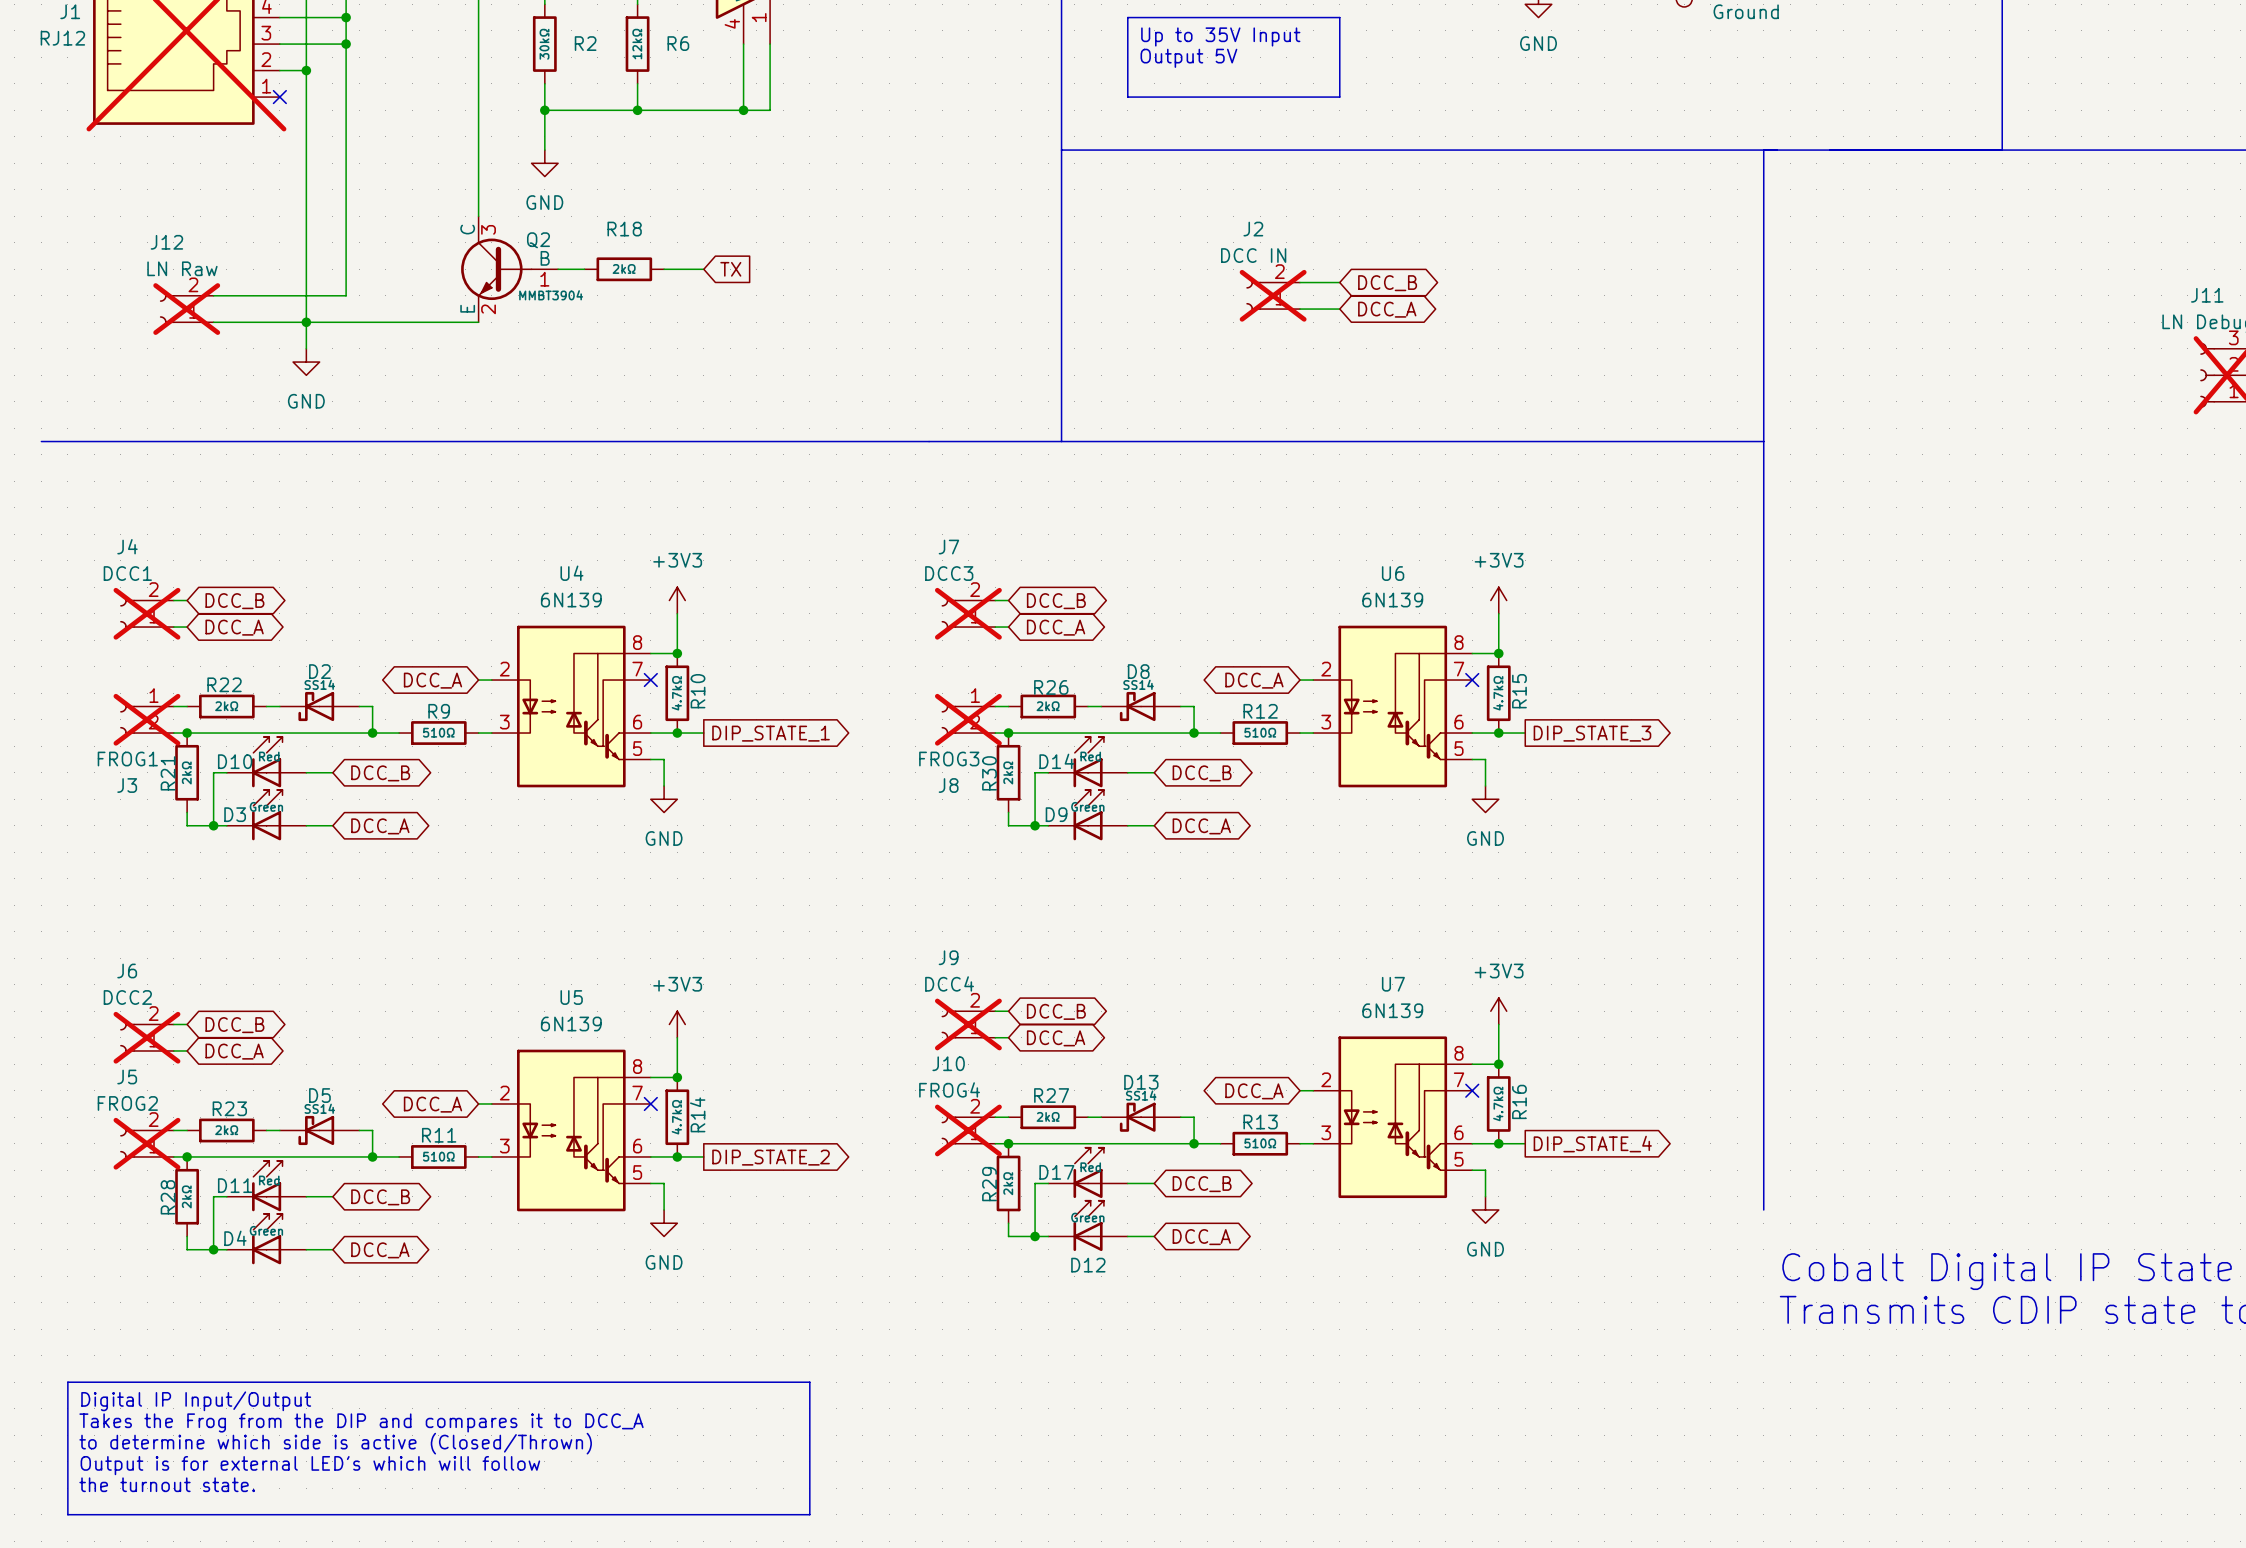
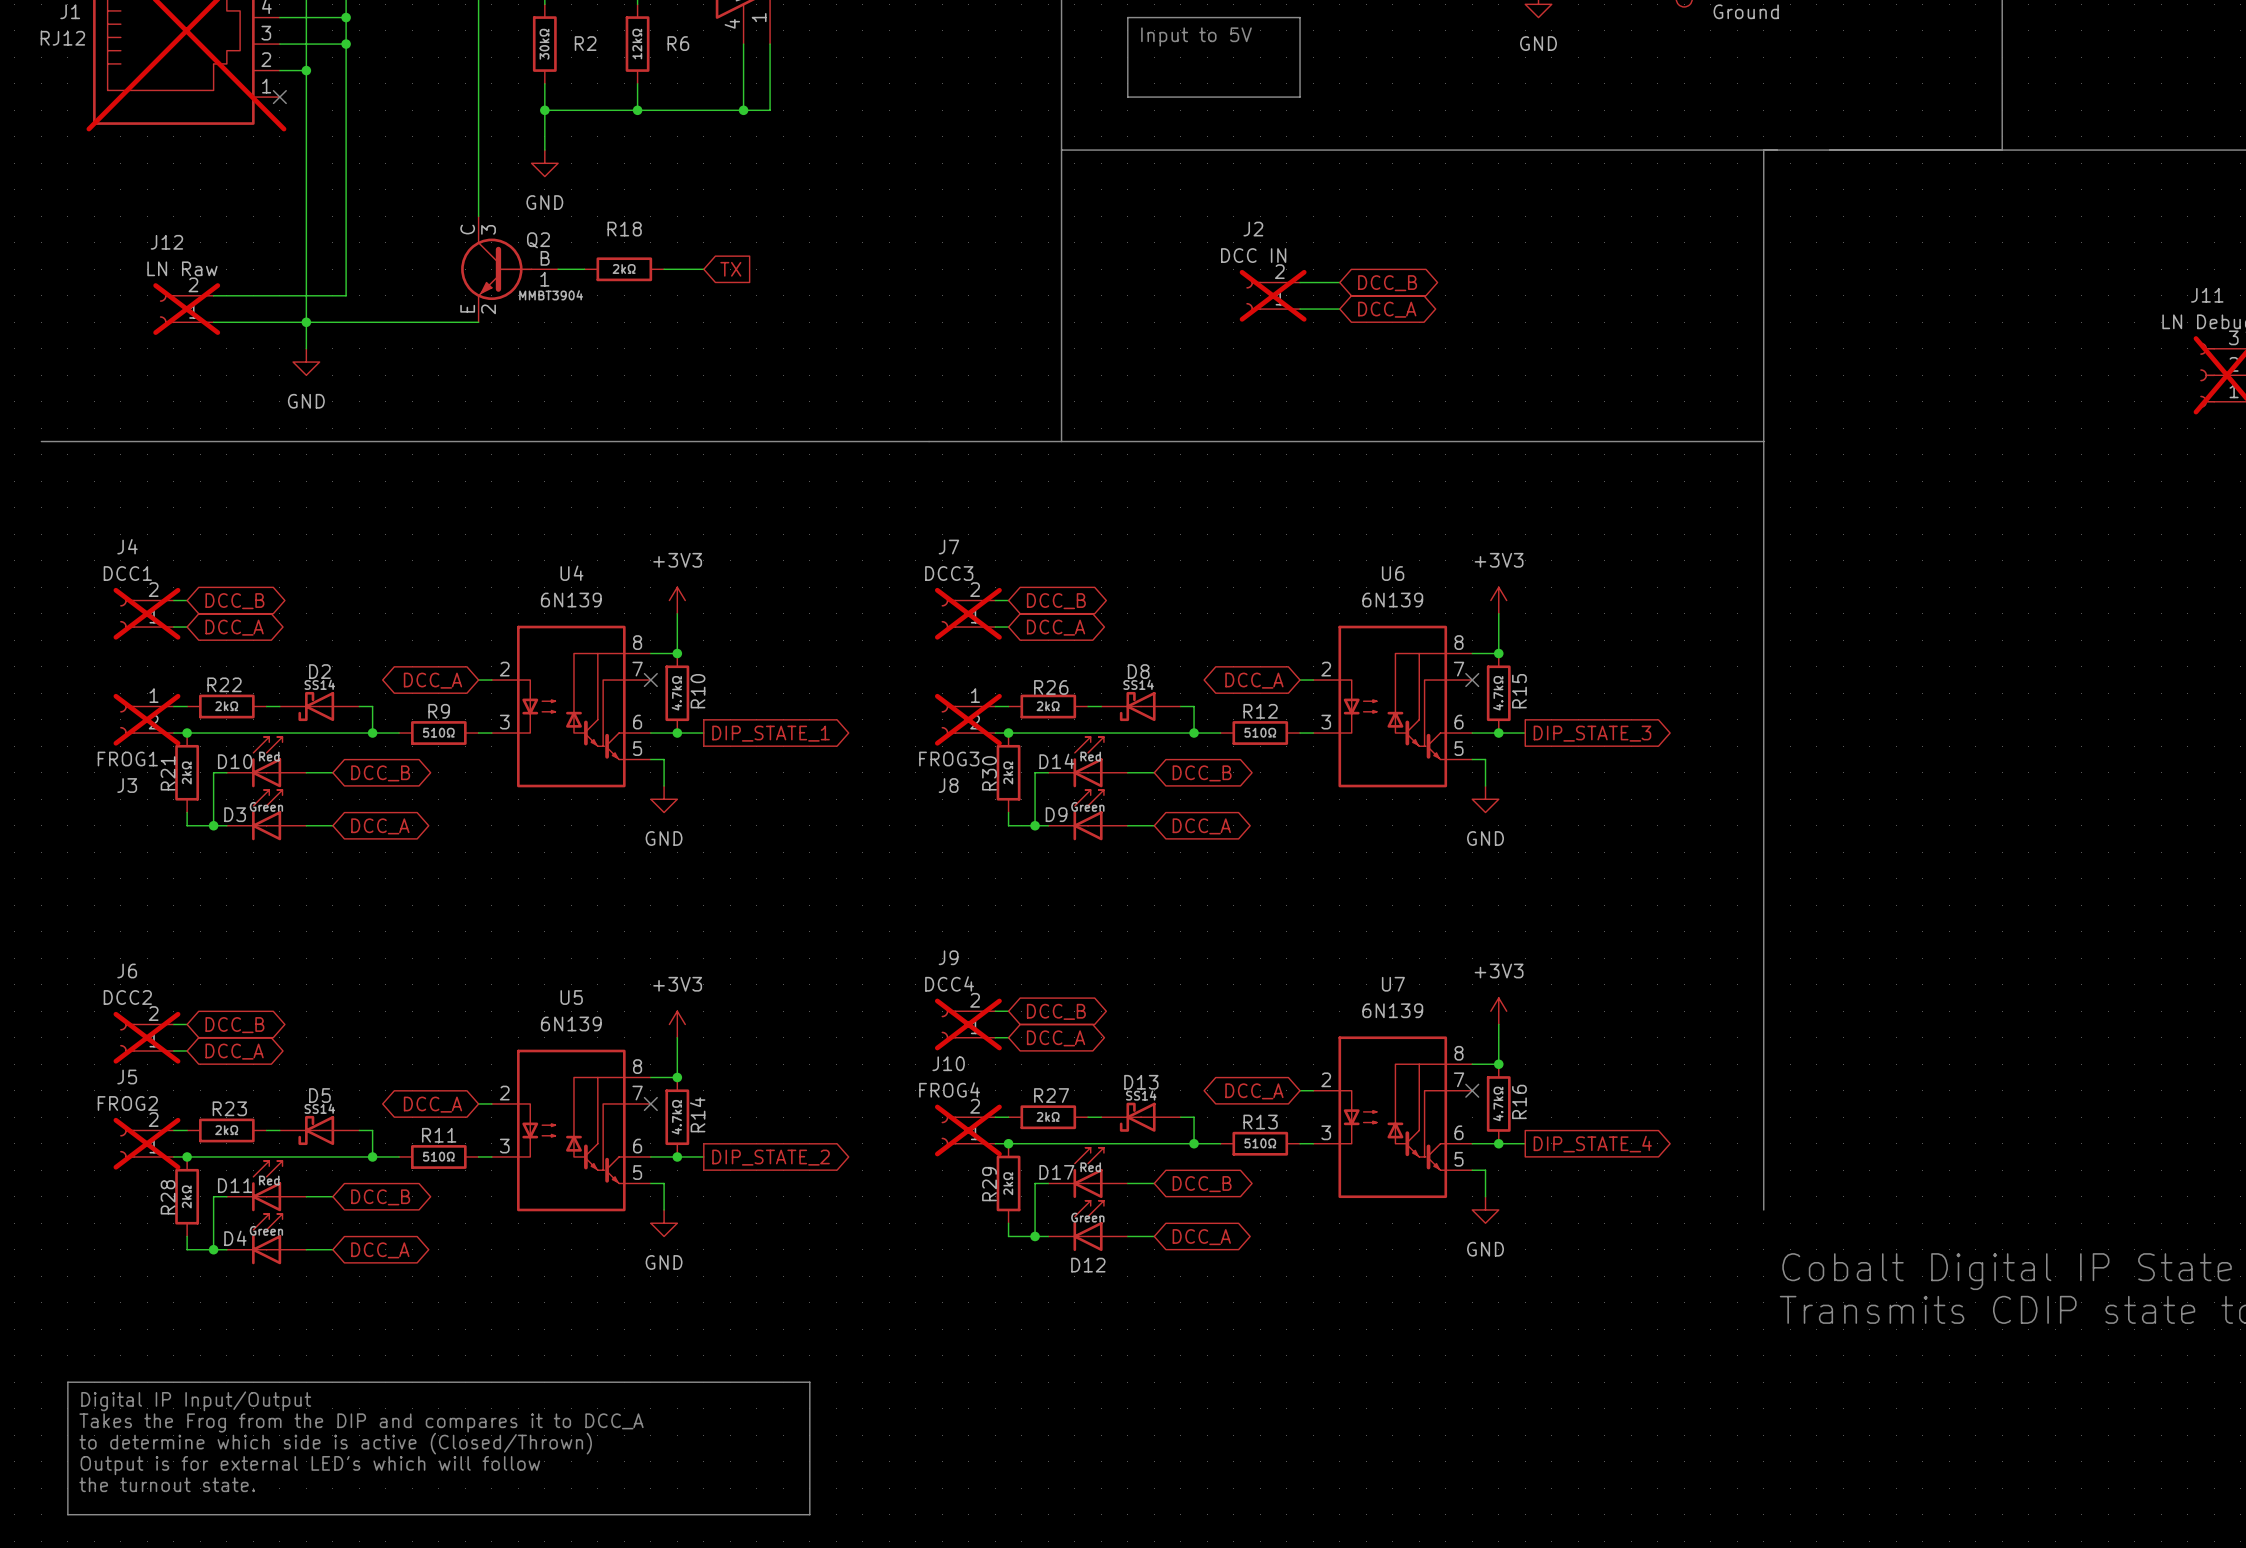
line: (1300, 17) (1339, 17) (1339, 97) (1300, 97) -> (1300, 17) (1300, 97)
text: Up to 35V Input (1220, 36) -> Input to 5V (1196, 36)
text: Output 5V (1188, 58) -> none

